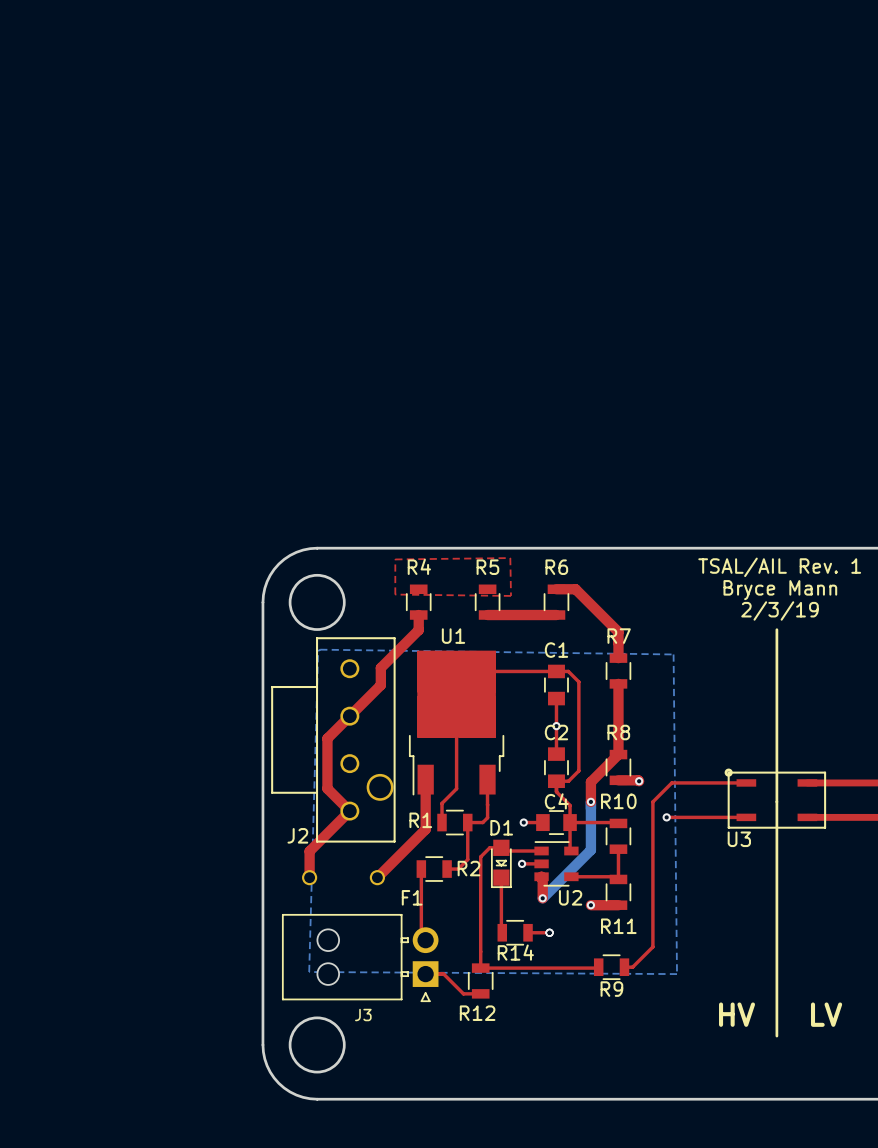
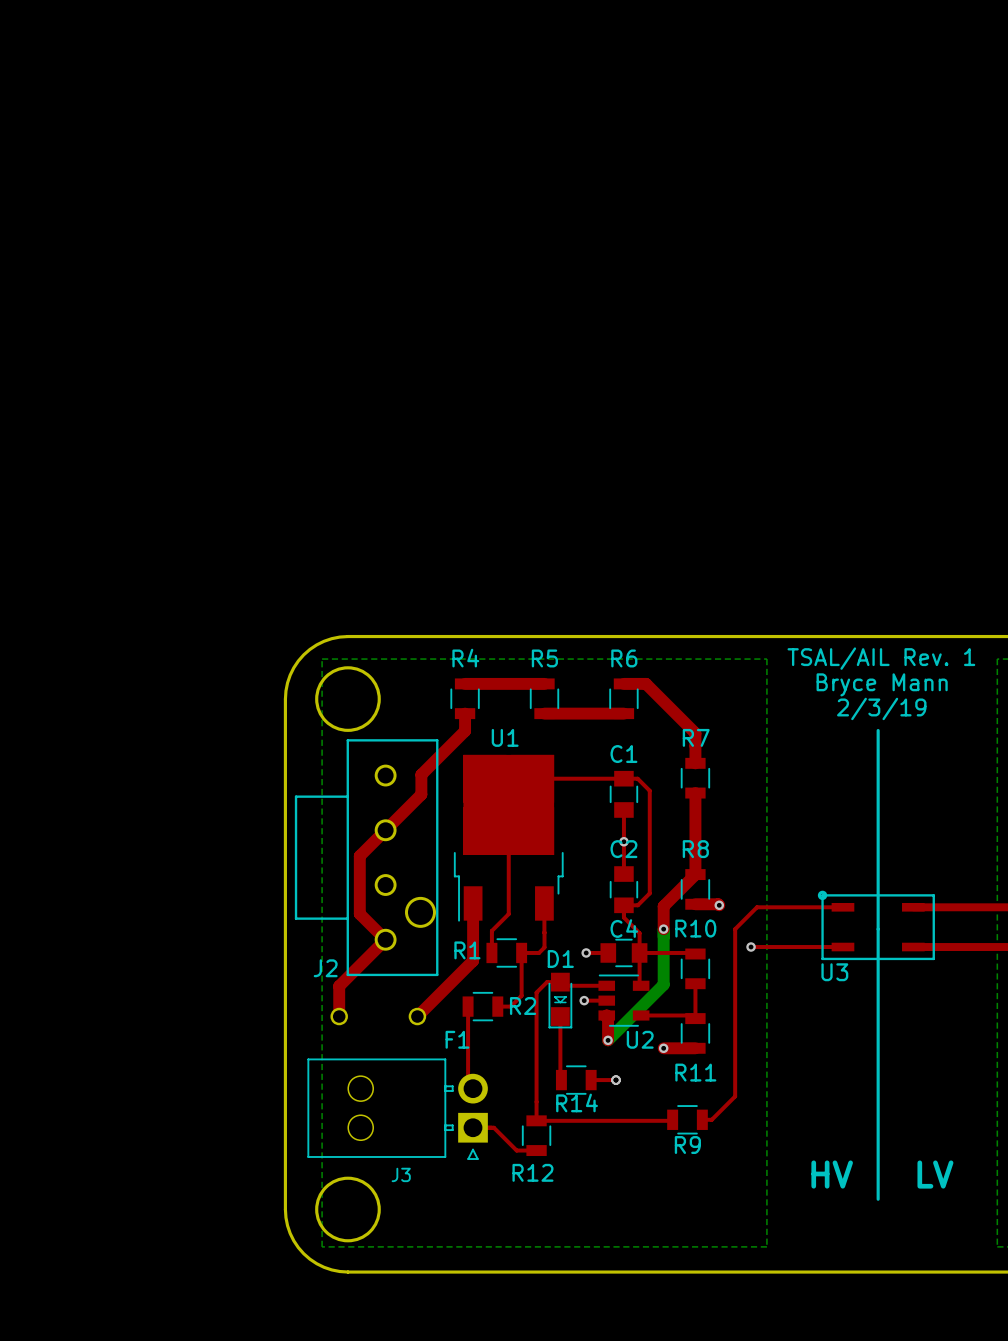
top zone outline: (510, 558) (395, 559) (395, 594) (511, 595) (510, 558) -> none
top track: none -> (465, 683) (544, 683)
bottom zone outline: (320, 649) (673, 654) (677, 974) (309, 972) (318, 651) (320, 649) -> (322, 659) (322, 1246) (766, 1246) (766, 659) (322, 659)

